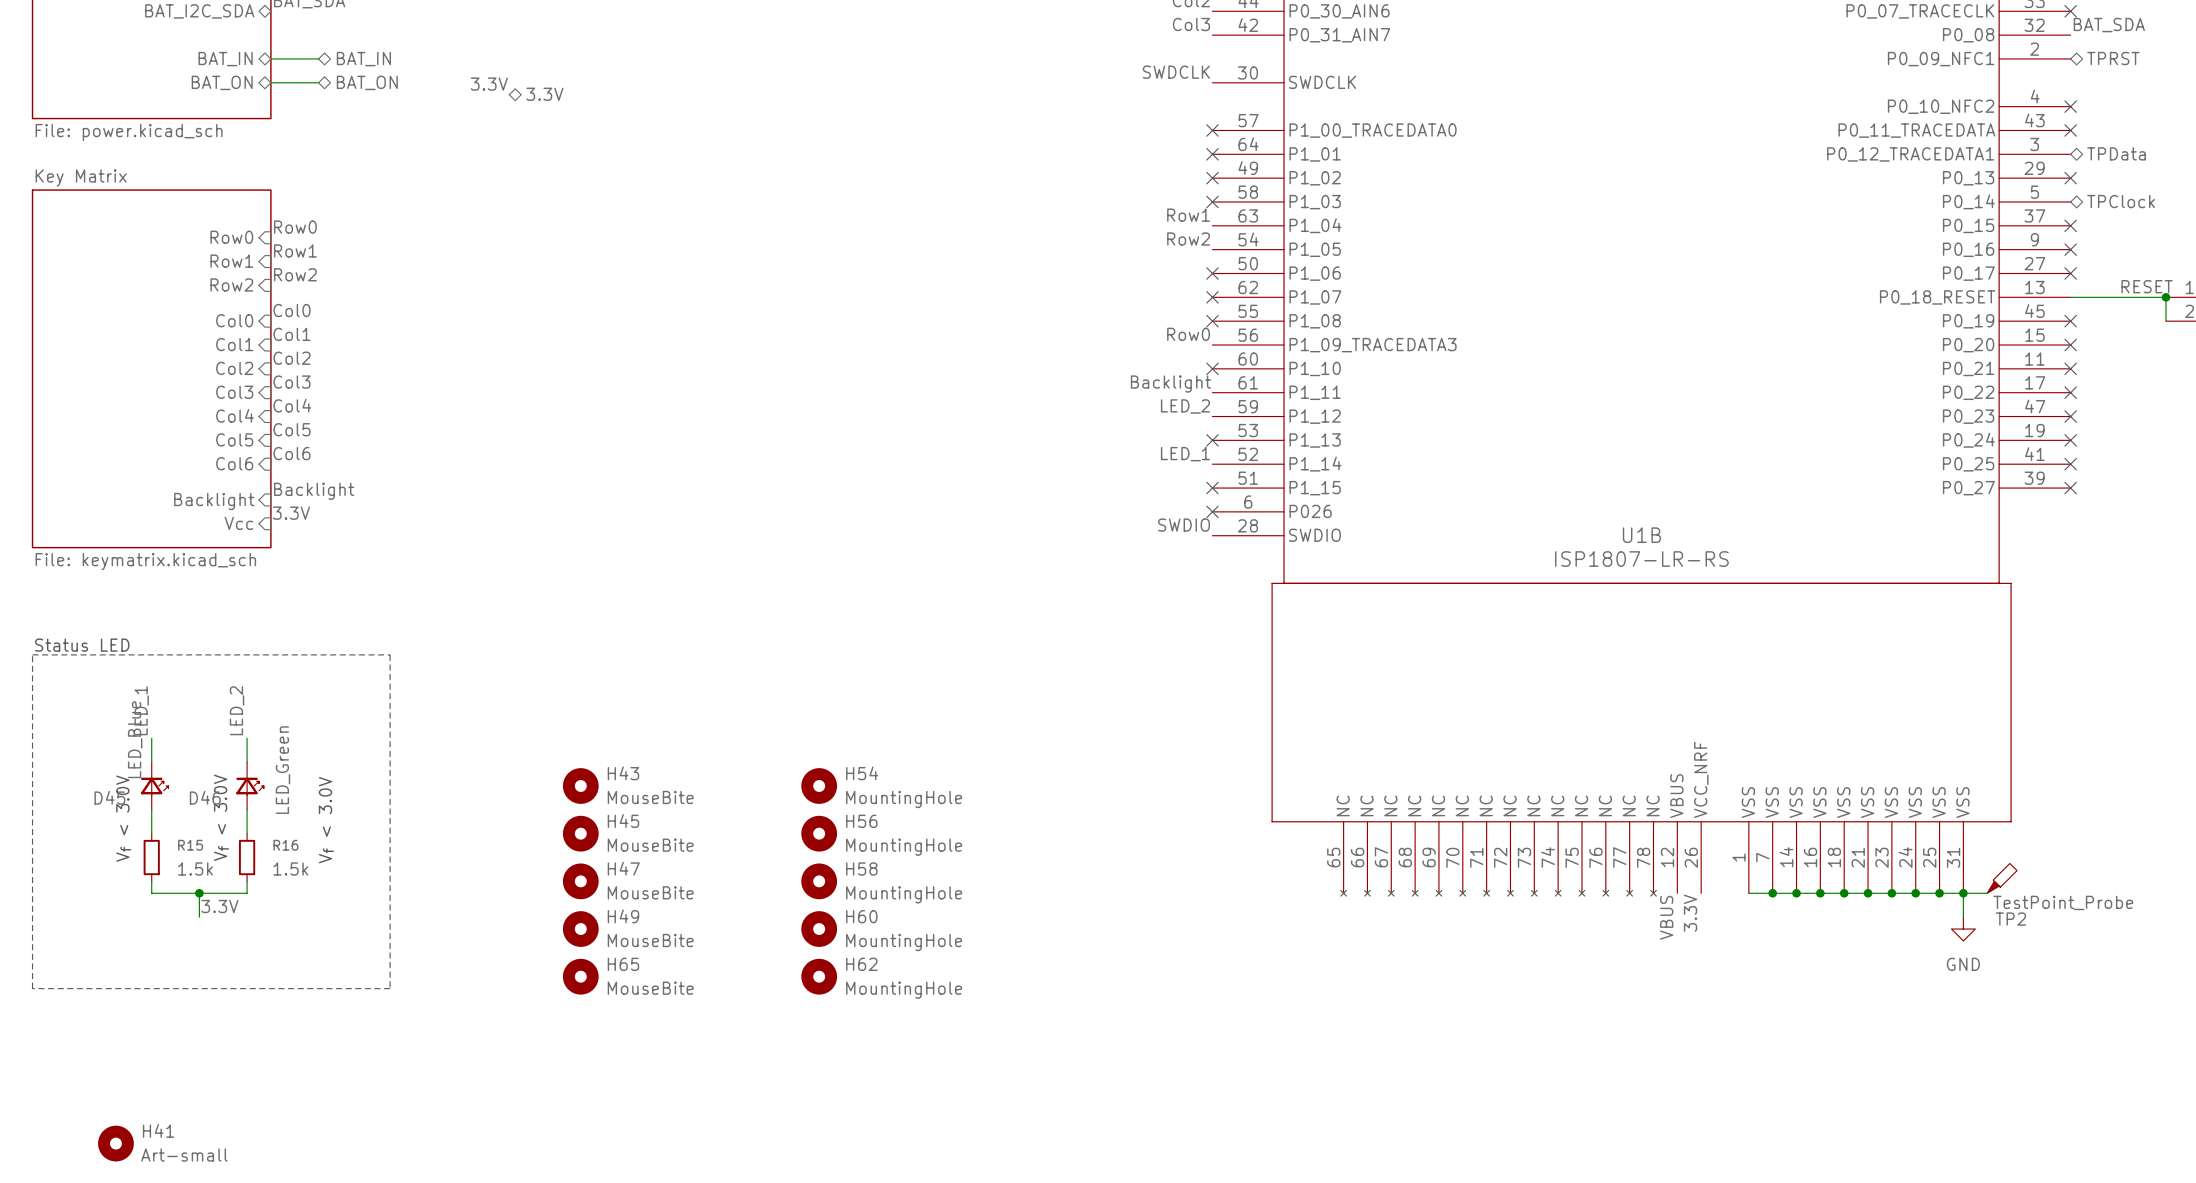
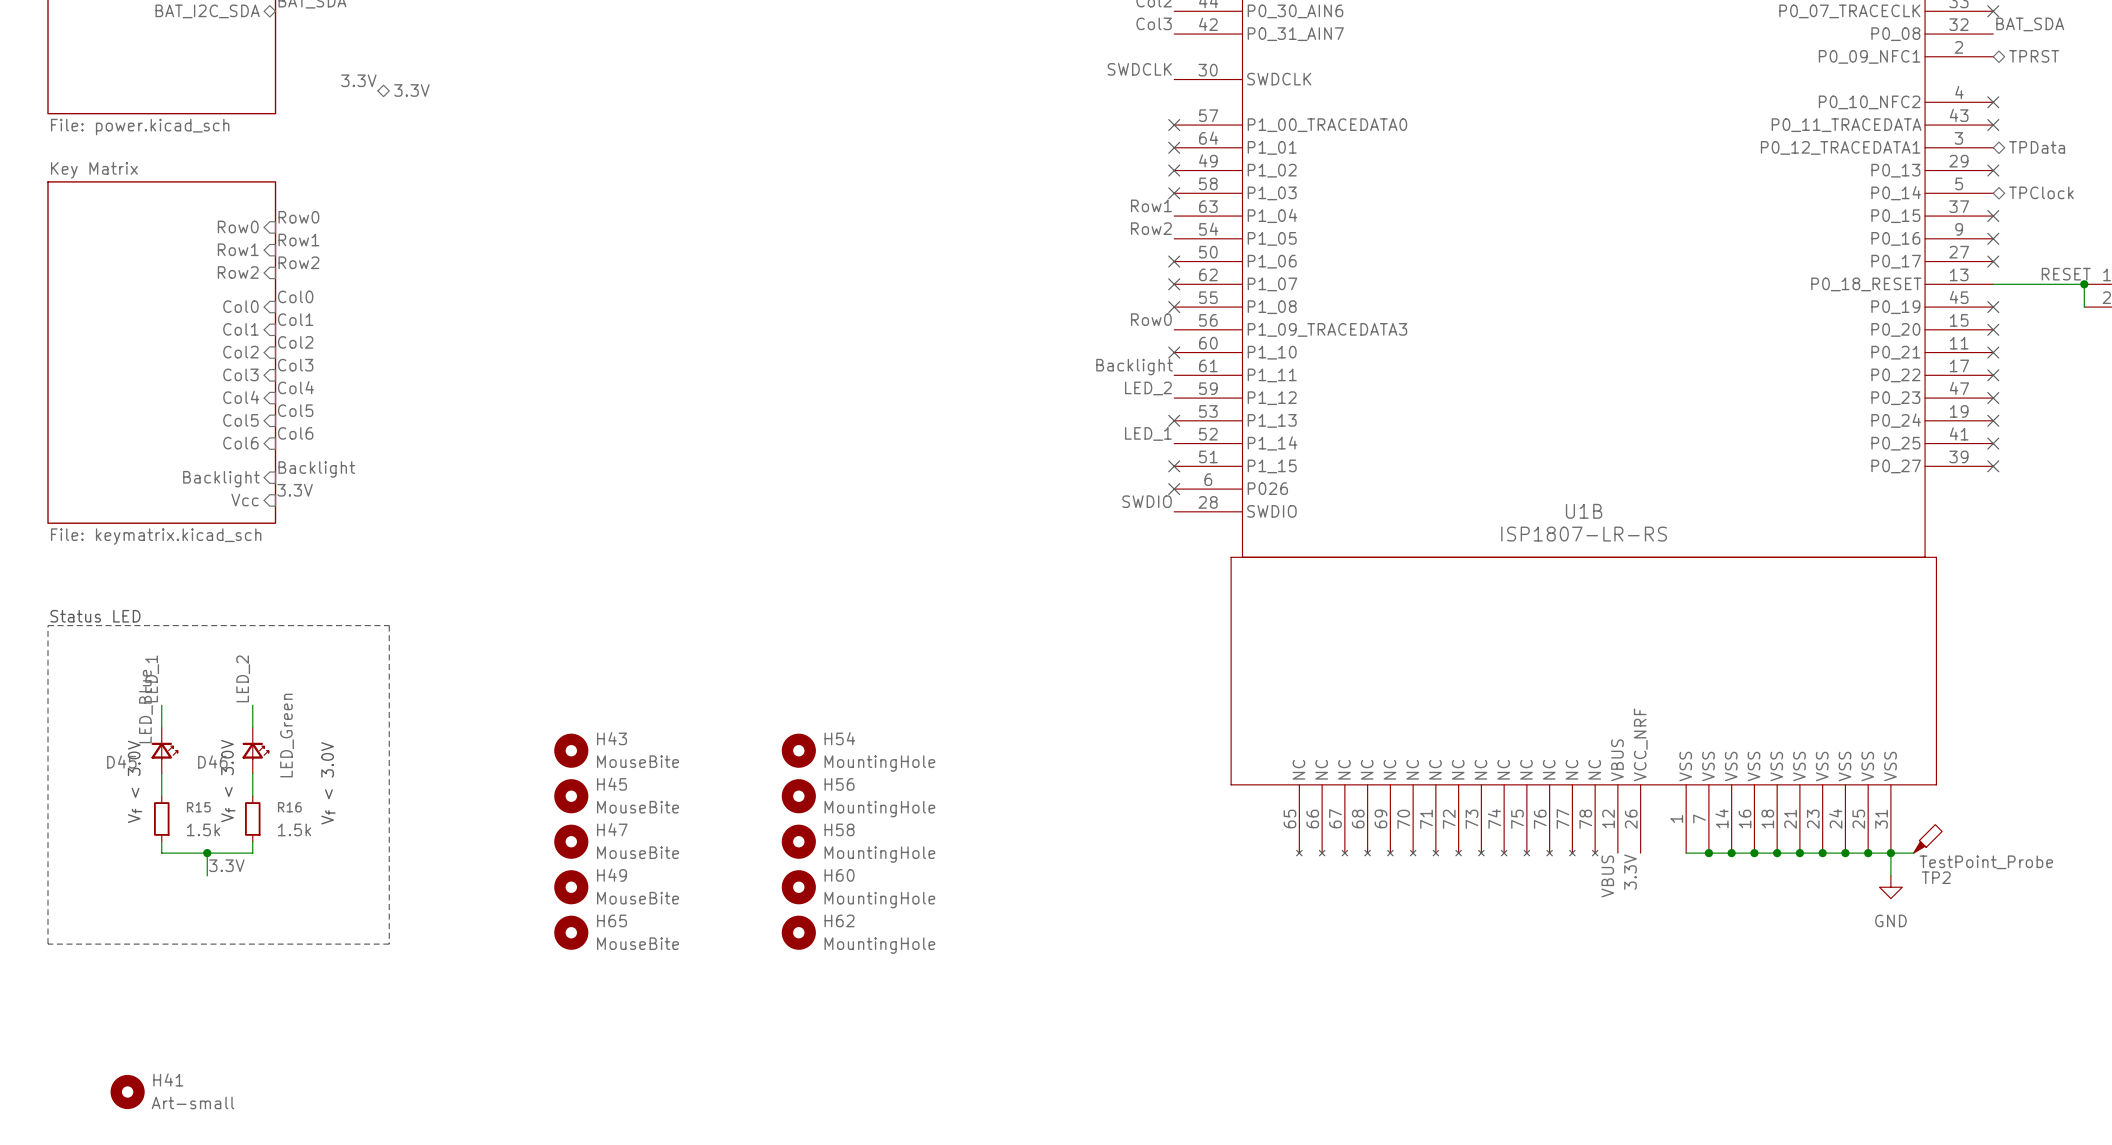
wire: (270, 58) (318, 58) -> none
sheet pin: BAT_IN (225, 59) -> none
hierarchical label: BAT_IN (363, 59) -> none
sheet pin: BAT_ON (222, 82) -> none
wire: (270, 82) (318, 82) -> none
hierarchical label: BAT_ON (367, 82) -> none
label position: 3.3V (489, 84) -> 3.3V (358, 80)
hierarchical label position: 3.3V (544, 94) -> 3.3V (411, 90)

